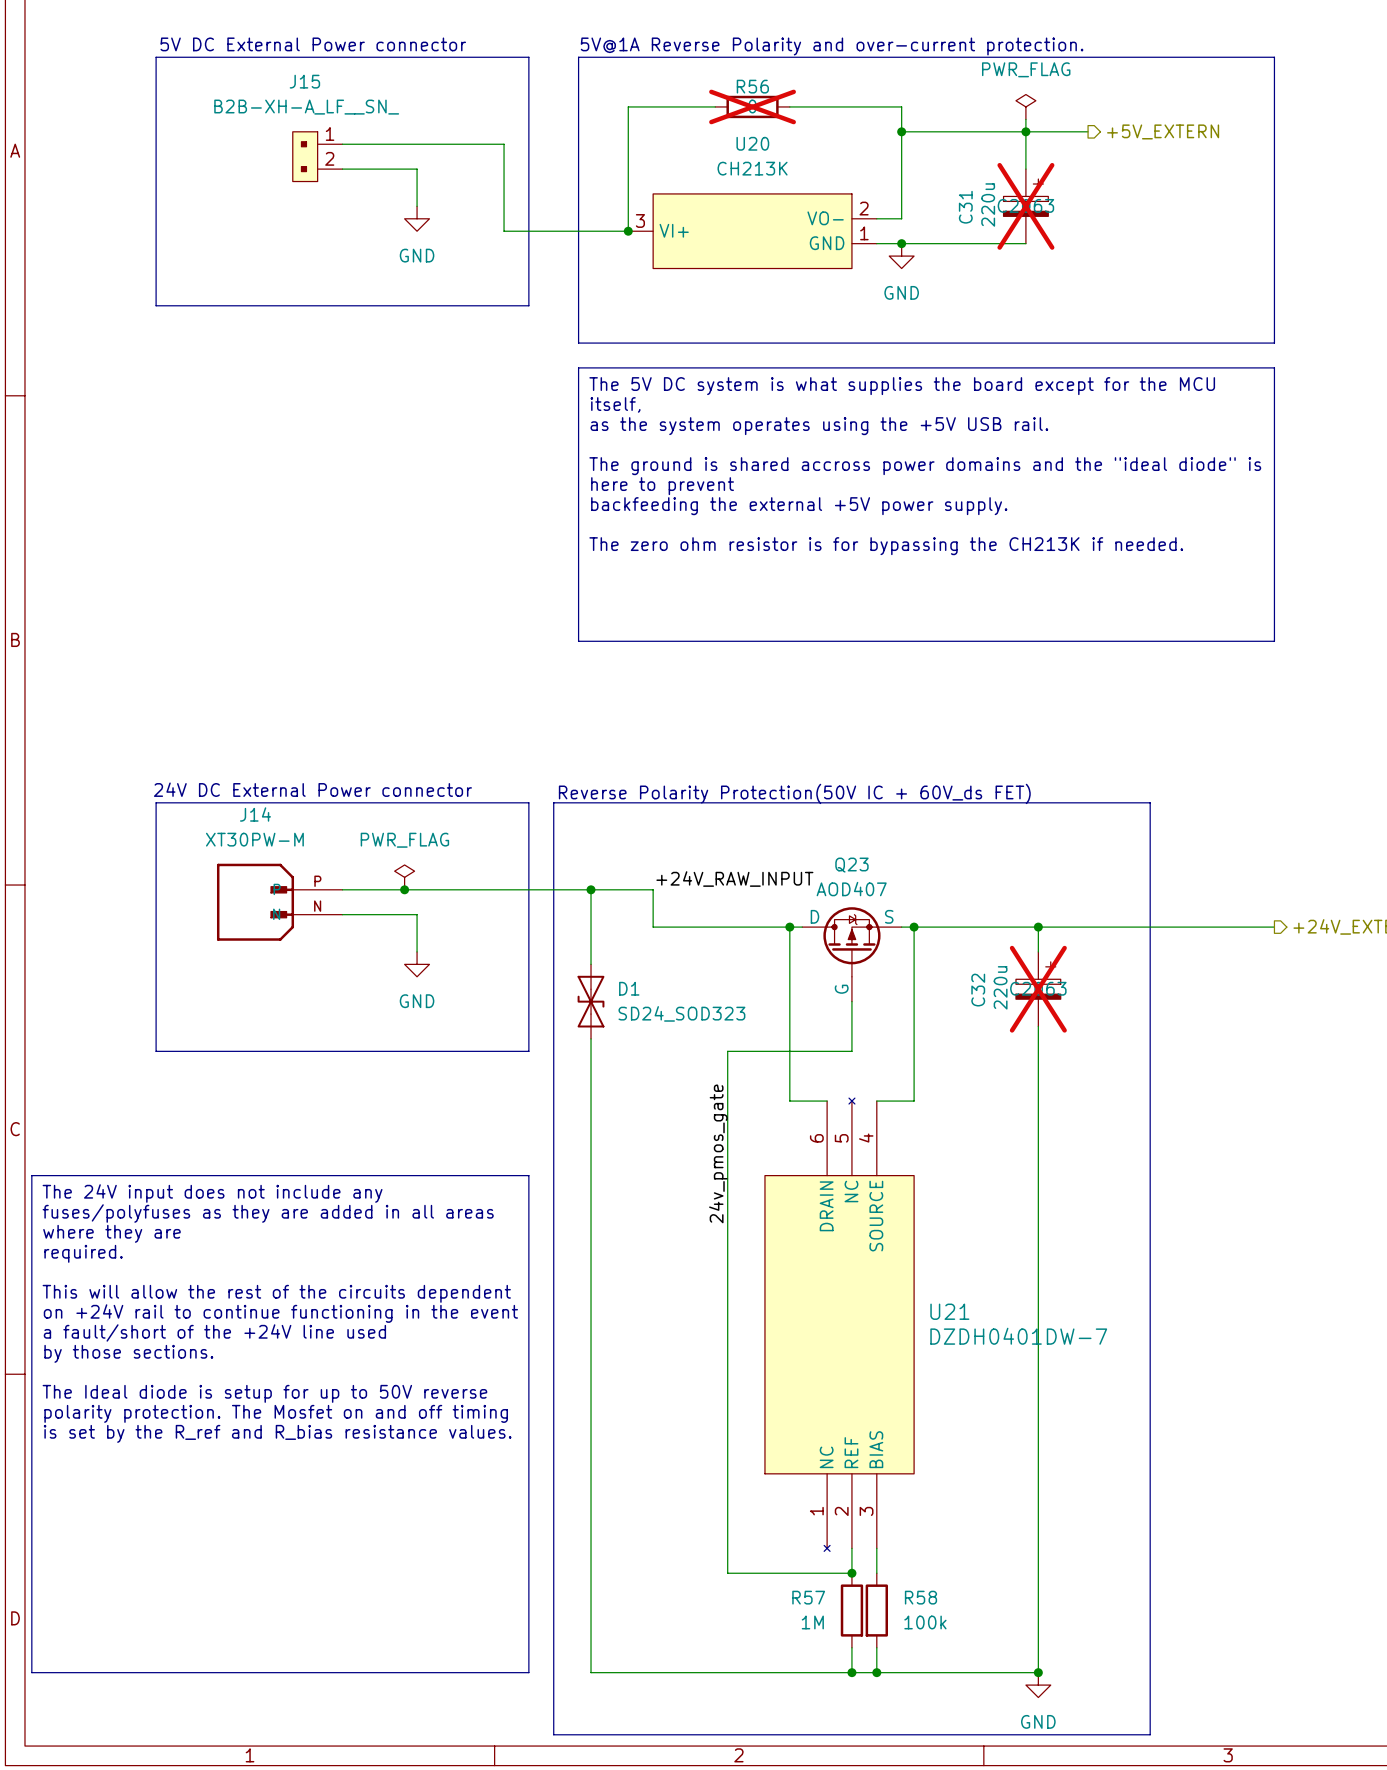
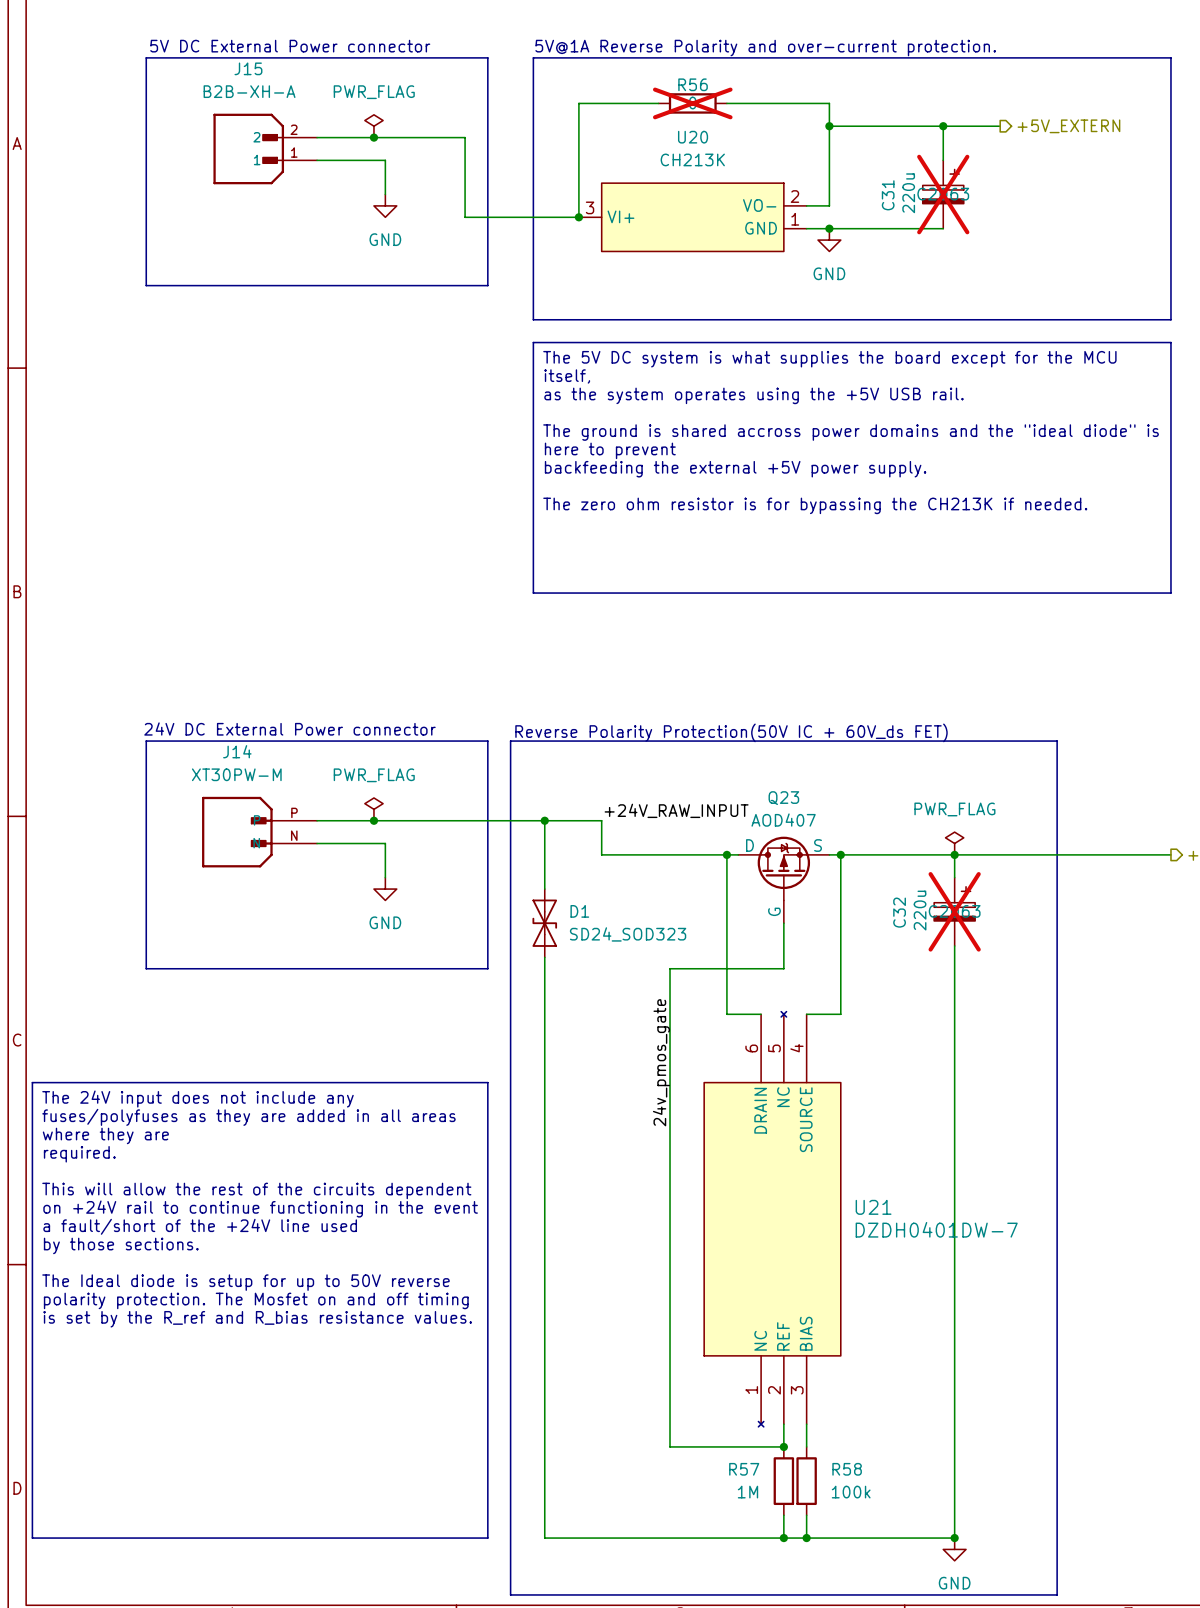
power symbol: PWR_FLAG (1025, 106) -> none
J15 value: B2B-XH-A_LF__SN_ (306, 107) -> B2B-XH-A (249, 91)
wire: (1025, 119) (1025, 131) -> none
J15 symbol: [292, 131, 343, 182] -> [213, 113, 318, 185]
power symbol: none -> PWR_FLAG (373, 126)
junction: none -> (373, 137)
power symbol: none -> PWR_FLAG (954, 843)

